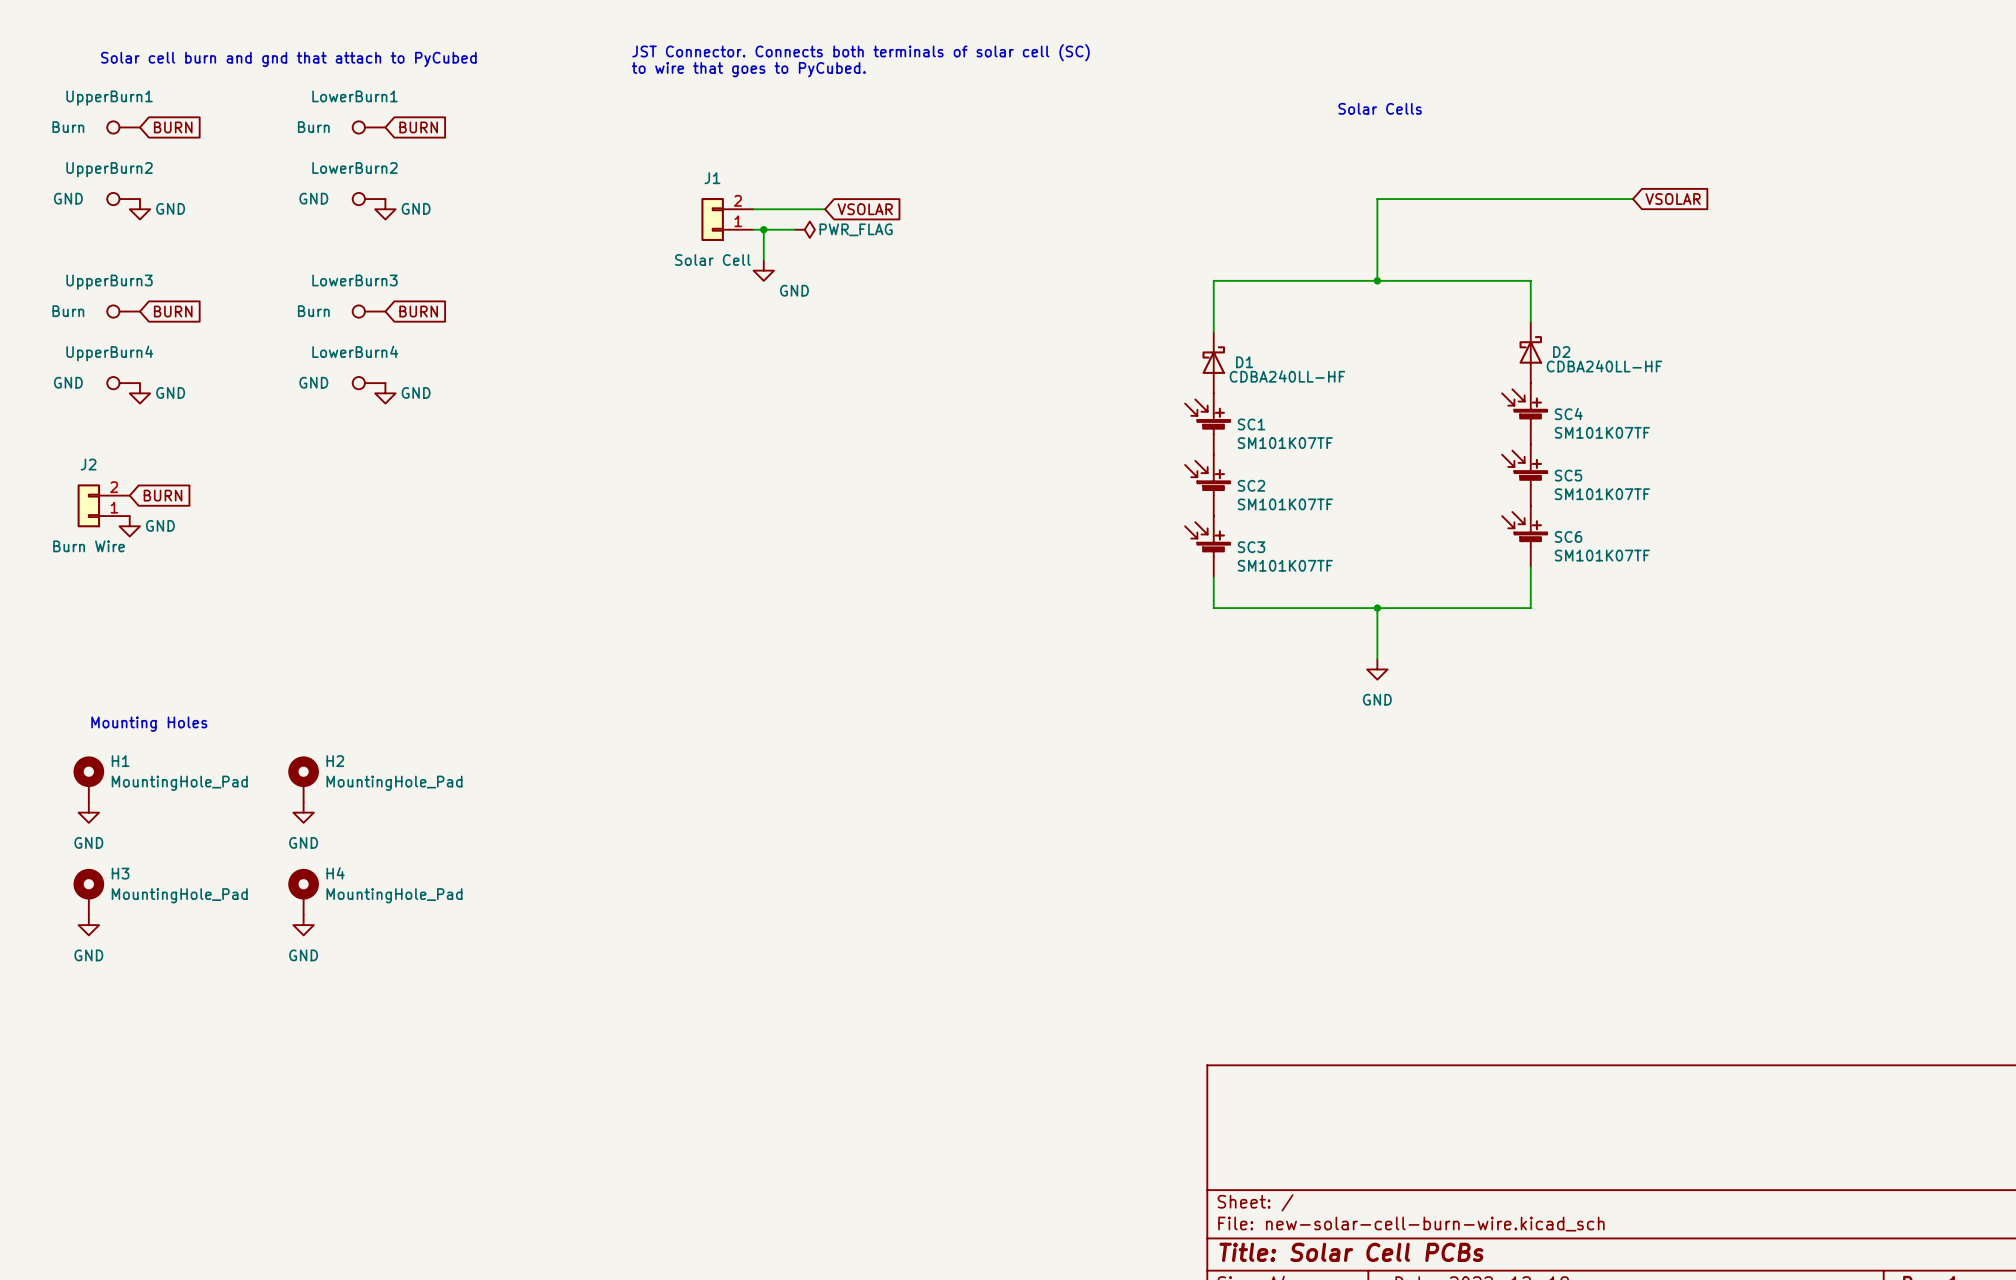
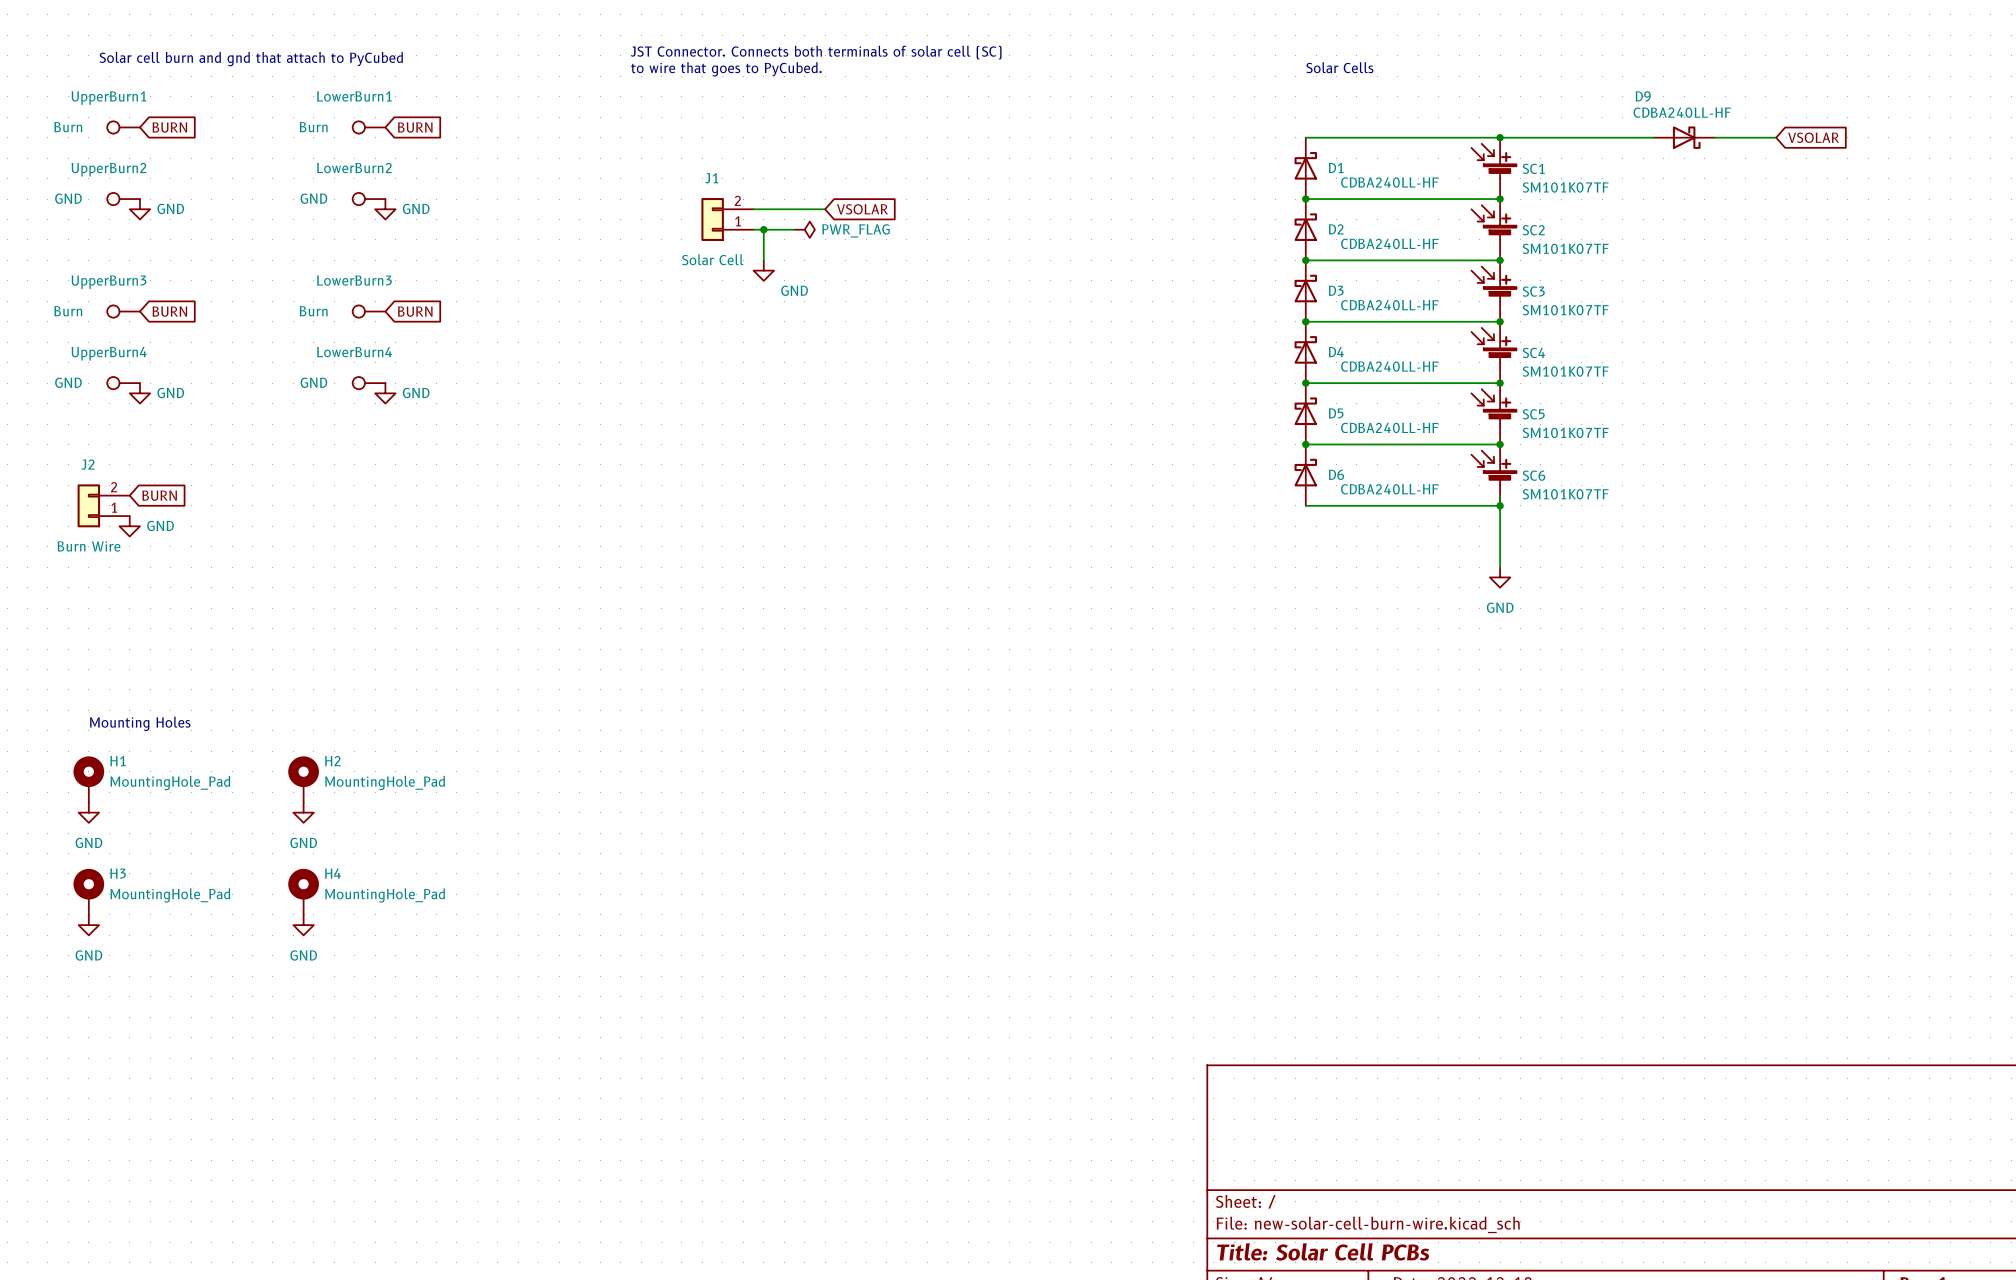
text position: Solar Cells (1380, 108) -> Solar Cells (1339, 67)
wire: none -> (1305, 137) (1653, 137)
junction: none -> (1500, 137)
D9: none -> CDBA240LL-HF (1684, 137)
wire: none -> (1714, 137) (1776, 137)
junction: none -> (1305, 199)
wire: (1377, 199) (1377, 280) -> (1377, 199) (1305, 199)
wire: (1500, 199) (1633, 199) -> none
junction: none -> (1500, 199)
global label position: VSOLAR (1673, 199) -> VSOLAR (1813, 137)
wire: none -> (1305, 260) (1500, 260)
junction: none -> (1305, 260)
junction: none -> (1500, 260)
junction: (1377, 280) -> none
D3: none -> CDBA240LL-HF (1305, 291)
wire: none -> (1305, 321) (1500, 321)
junction: none -> (1305, 321)
junction: none -> (1500, 321)
wire: (1530, 321) (1530, 280) (1213, 280) (1213, 331) -> none
D4: none -> CDBA240LL-HF (1305, 352)
D2 position: (1530, 352) -> (1305, 229)
D1 position: (1213, 362) -> (1305, 168)
wire: none -> (1305, 383) (1500, 383)
junction: none -> (1305, 383)
junction: none -> (1500, 383)
D5: none -> CDBA240LL-HF (1305, 413)
SC4 position: (1524, 413) -> (1493, 352)
SC1 position: (1207, 424) -> (1493, 168)
wire: none -> (1305, 444) (1500, 444)
junction: none -> (1305, 444)
junction: none -> (1500, 444)
D6: none -> CDBA240LL-HF (1305, 475)
SC5 position: (1524, 475) -> (1493, 413)
SC2 position: (1207, 485) -> (1493, 229)
wire: none -> (1500, 495) (1500, 567)
wire: none -> (1305, 505) (1500, 505)
junction: none -> (1500, 505)
SC6 position: (1524, 536) -> (1493, 475)
SC3 position: (1207, 546) -> (1493, 291)
wire: (1530, 567) (1530, 608) (1213, 608) (1213, 577) -> none
wire: (1377, 608) (1377, 659) -> none
junction: (1377, 608) -> none
power symbol position: GND (1377, 669) -> GND (1500, 577)

